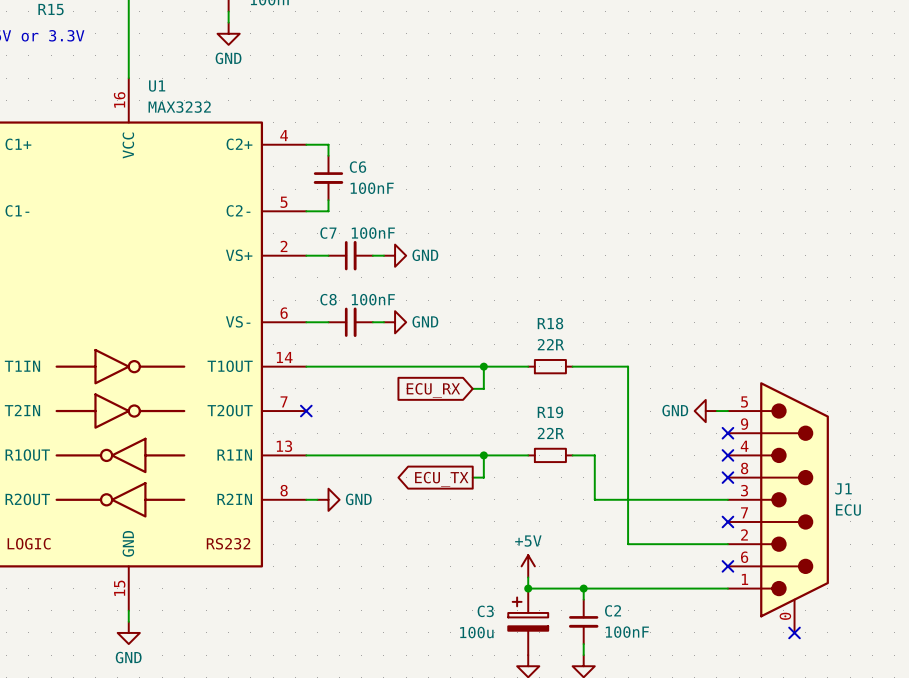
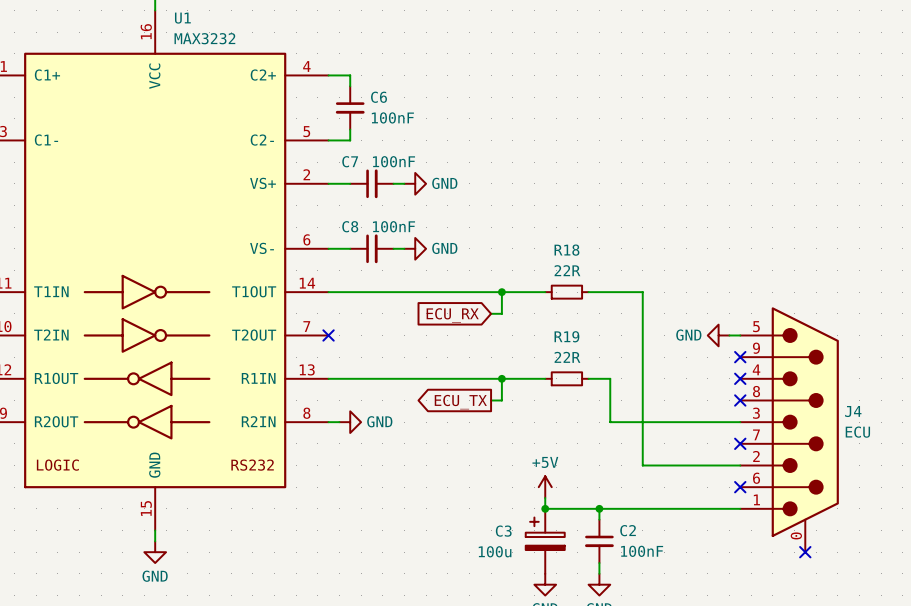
J1 name: J1 (843, 488) -> J4 (853, 411)

